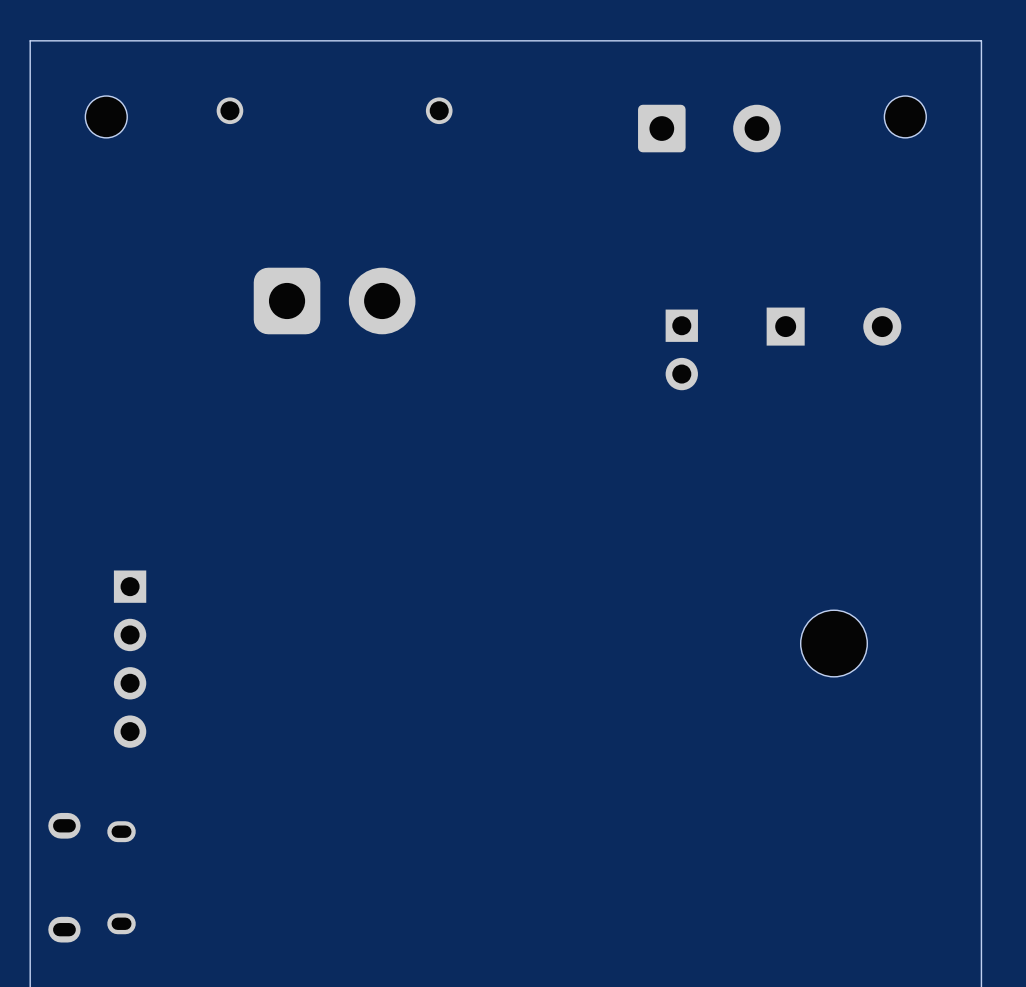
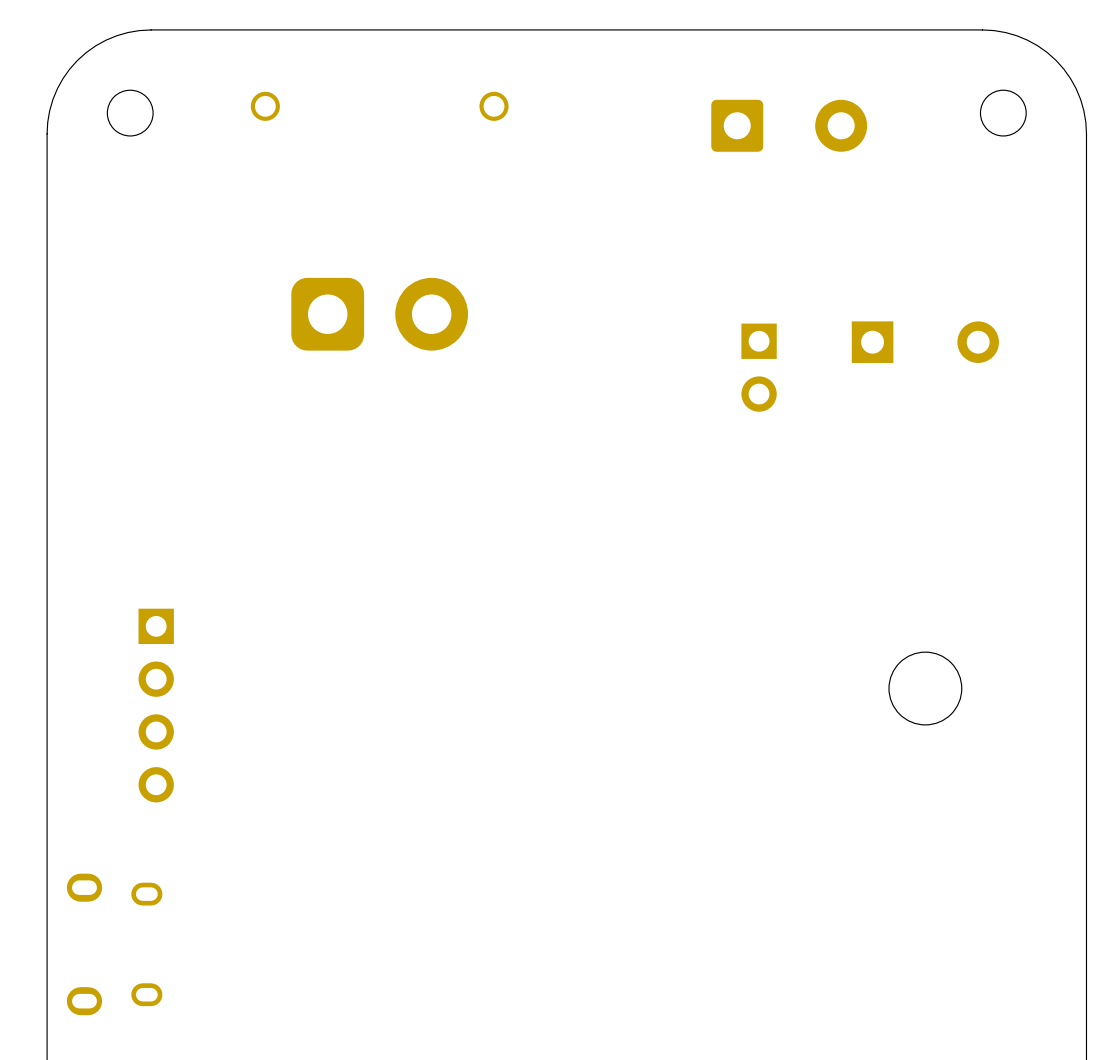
board edge: (125, 40) (30, 40) (30, 135) -> (151, 29) (116, 35) (95, 45) (77, 60) (63, 78) (52, 99) (47, 133)
board edge: (886, 40) (981, 40) (981, 135) -> (982, 29) (1016, 35) (1037, 45) (1056, 60) (1070, 78) (1080, 99) (1086, 133)

